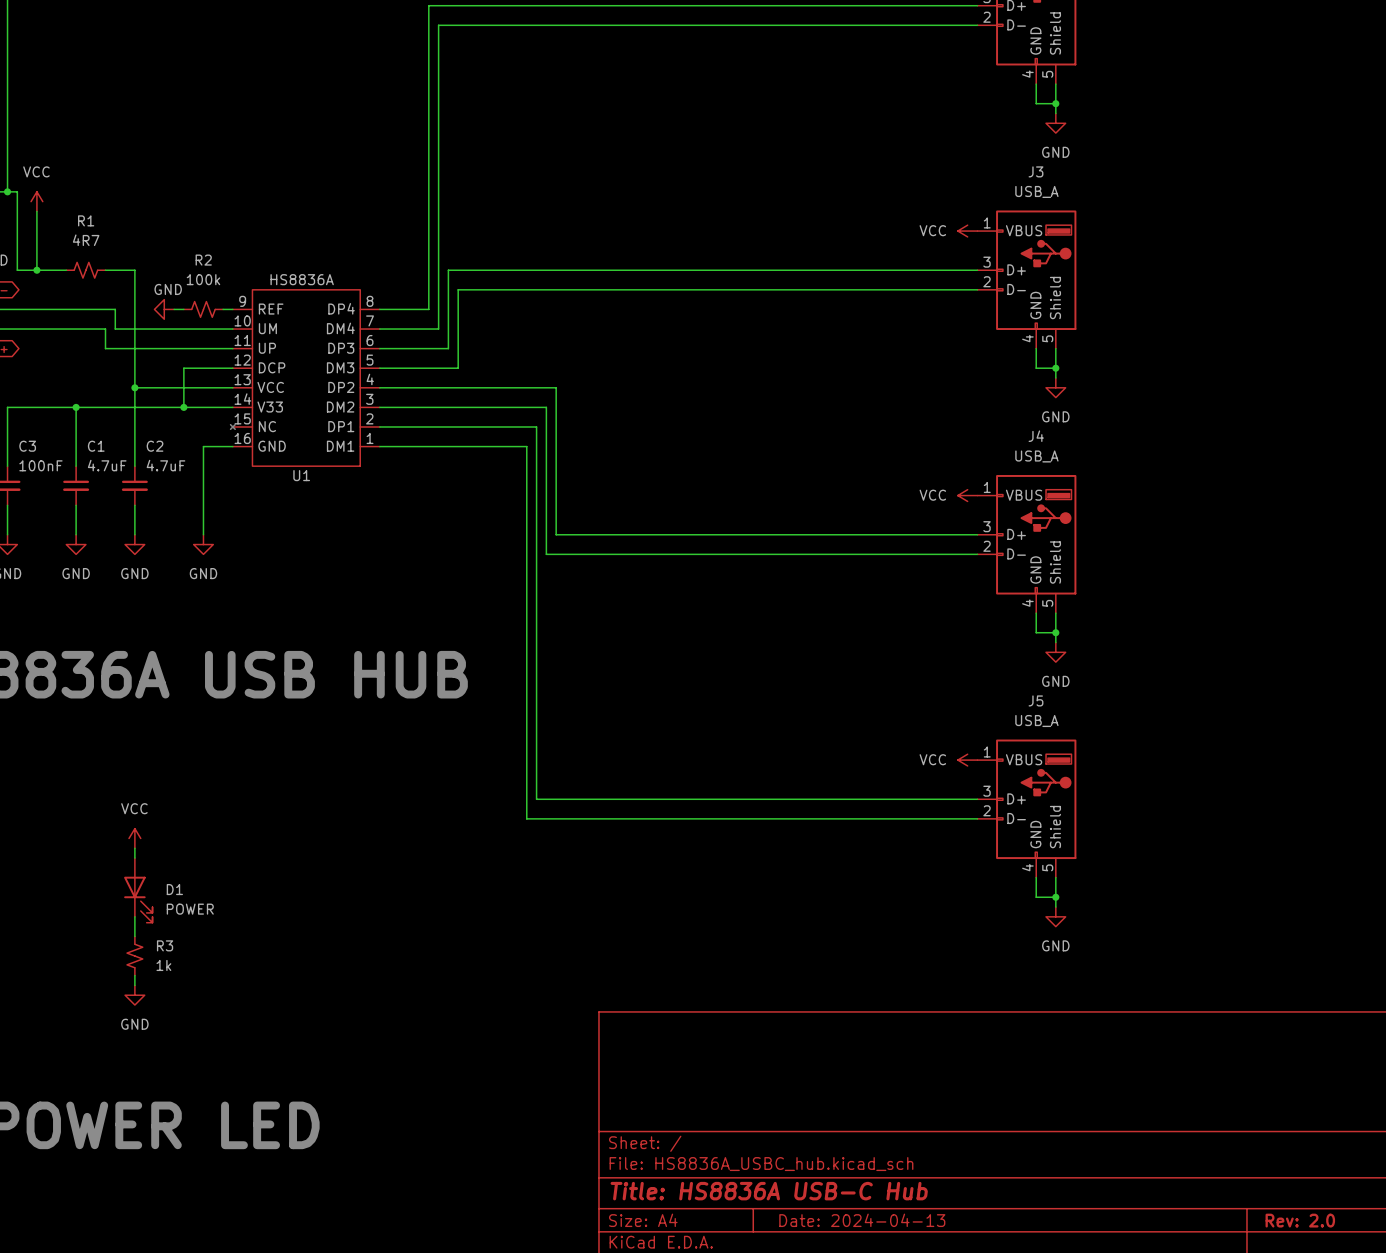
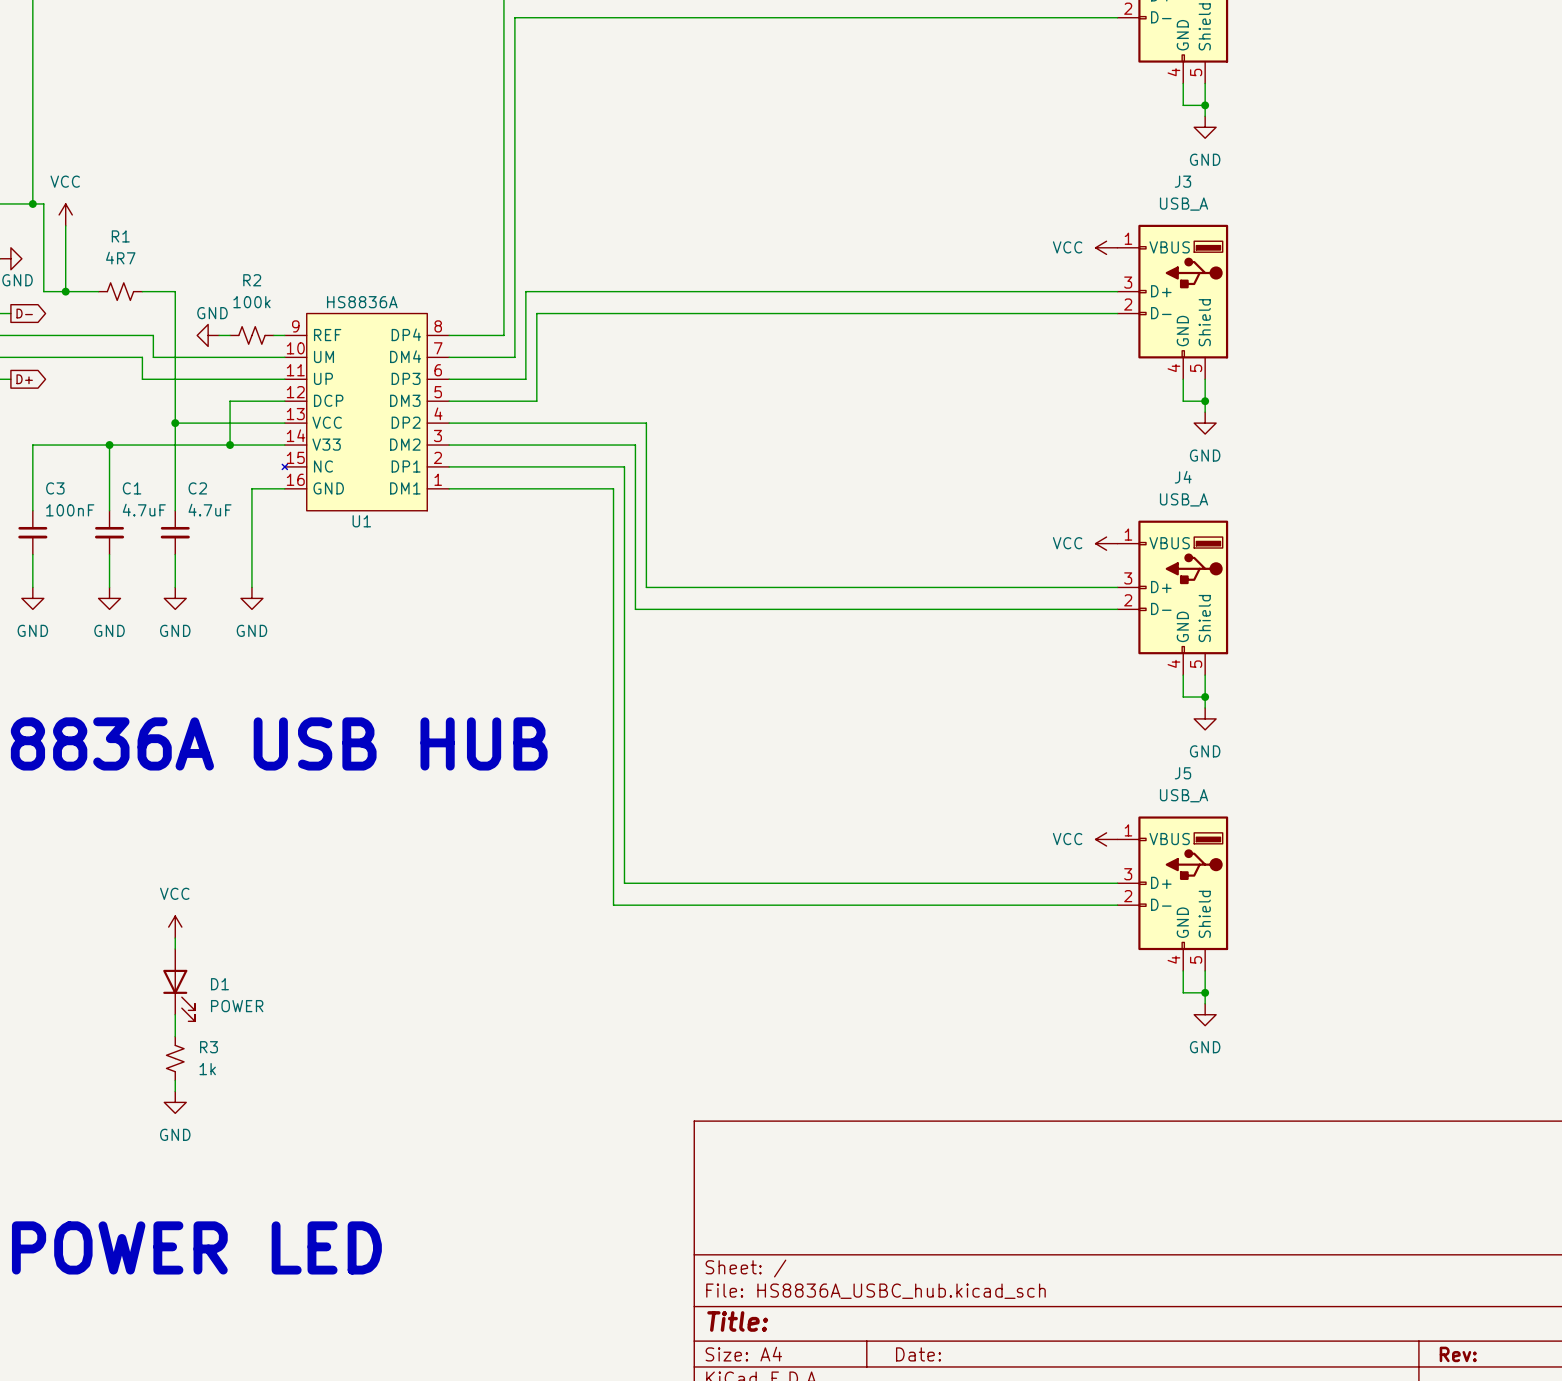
title block: Title: HS8836A USB-C Hub (769, 1191) -> Title: (737, 1321)
title block: Date: 2024-04-13 (862, 1220) -> Date: (918, 1354)
title block: Rev: 2.0 (1300, 1220) -> Rev: (1458, 1354)

